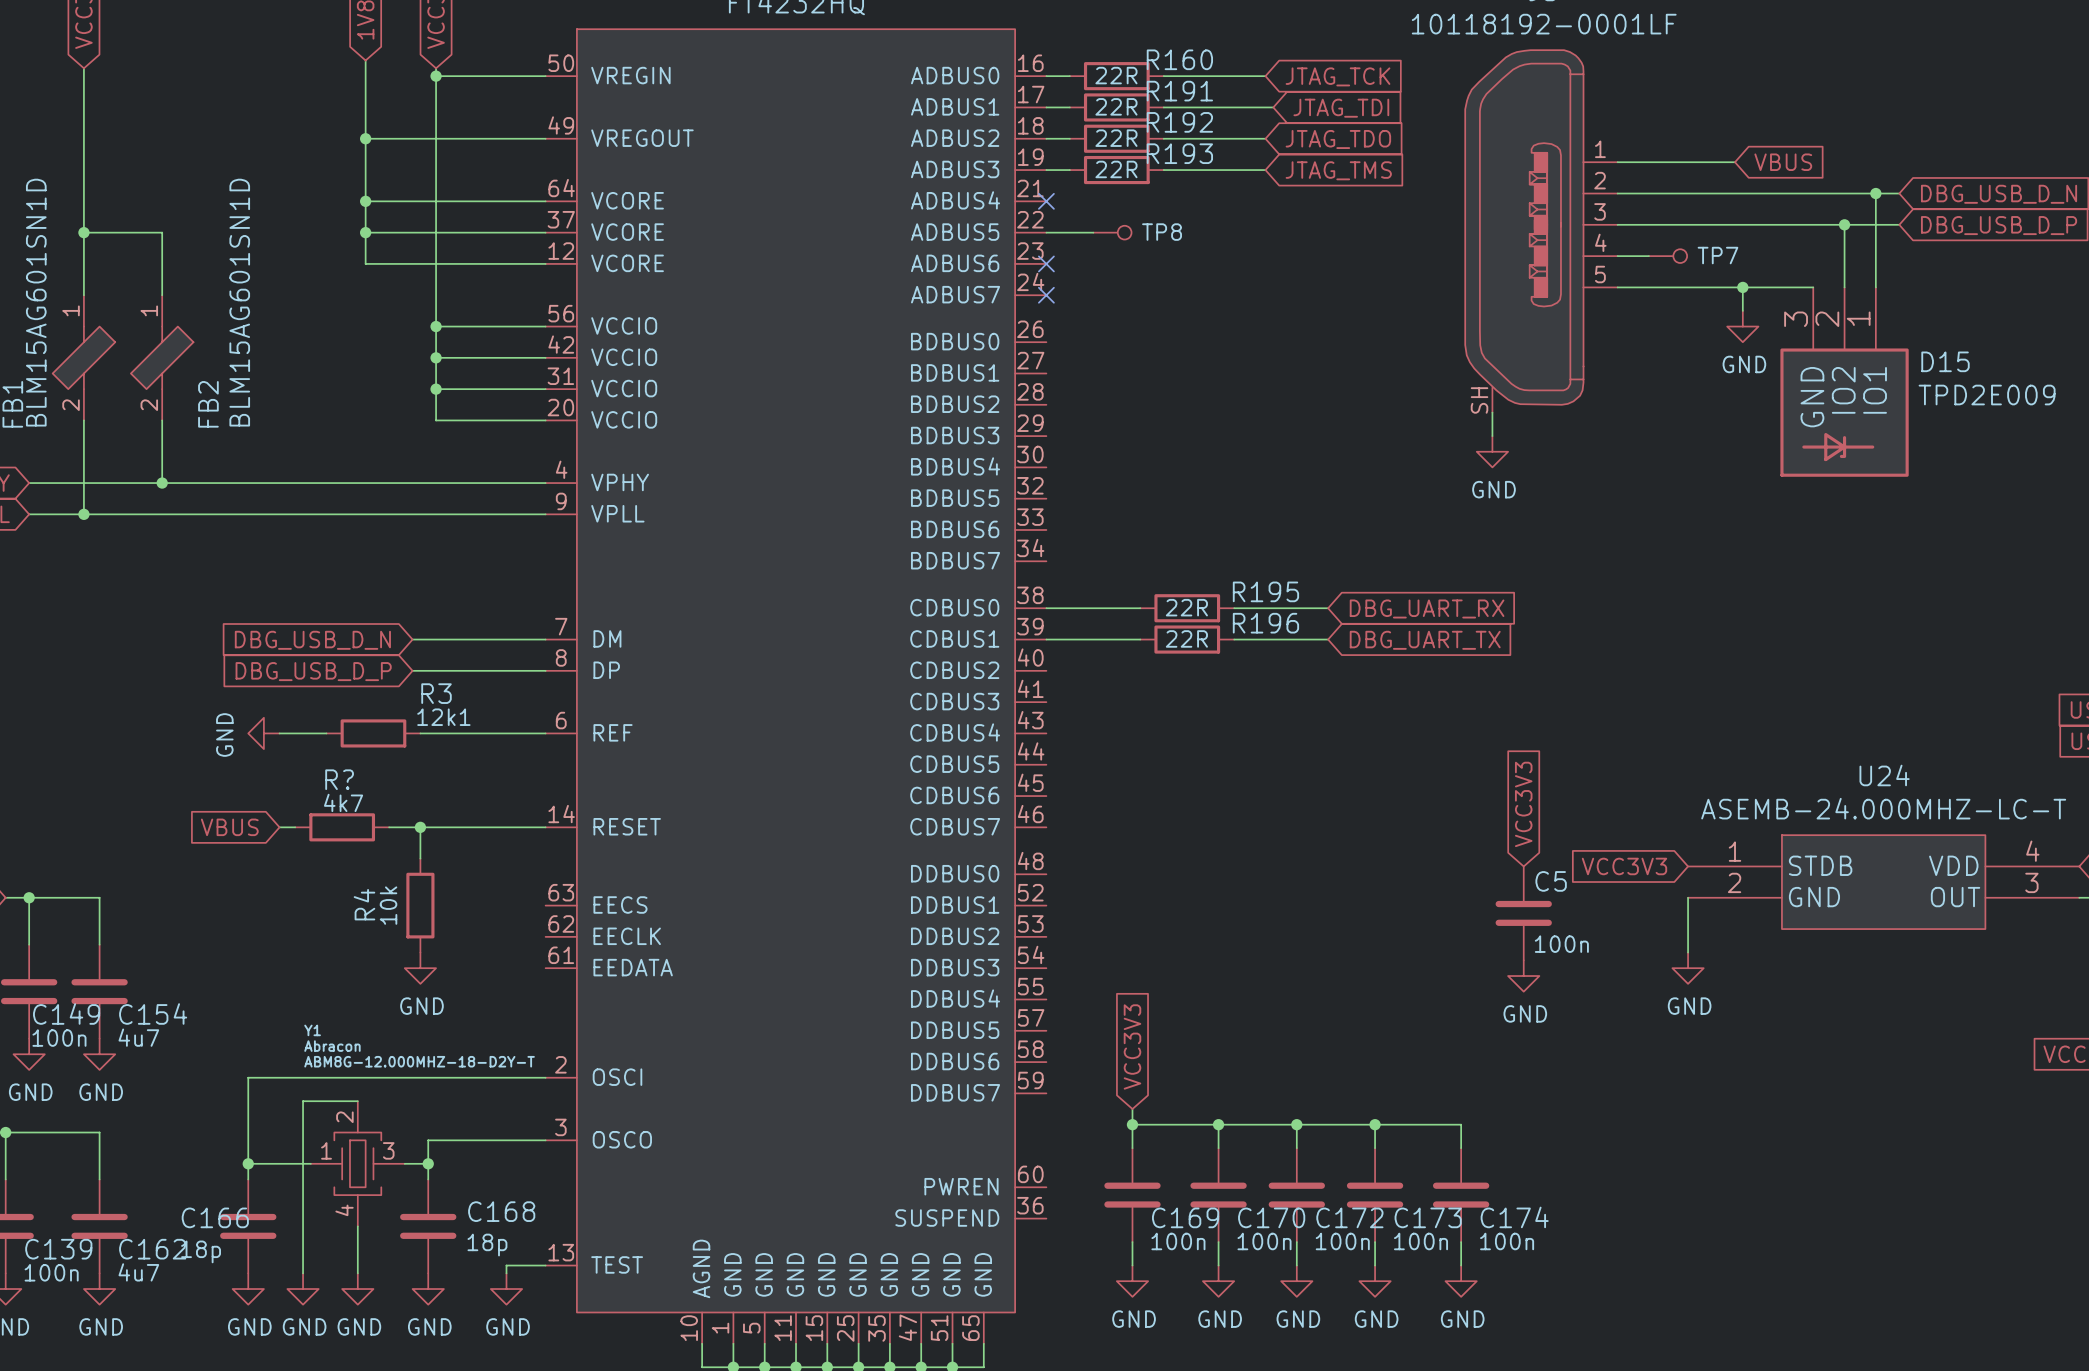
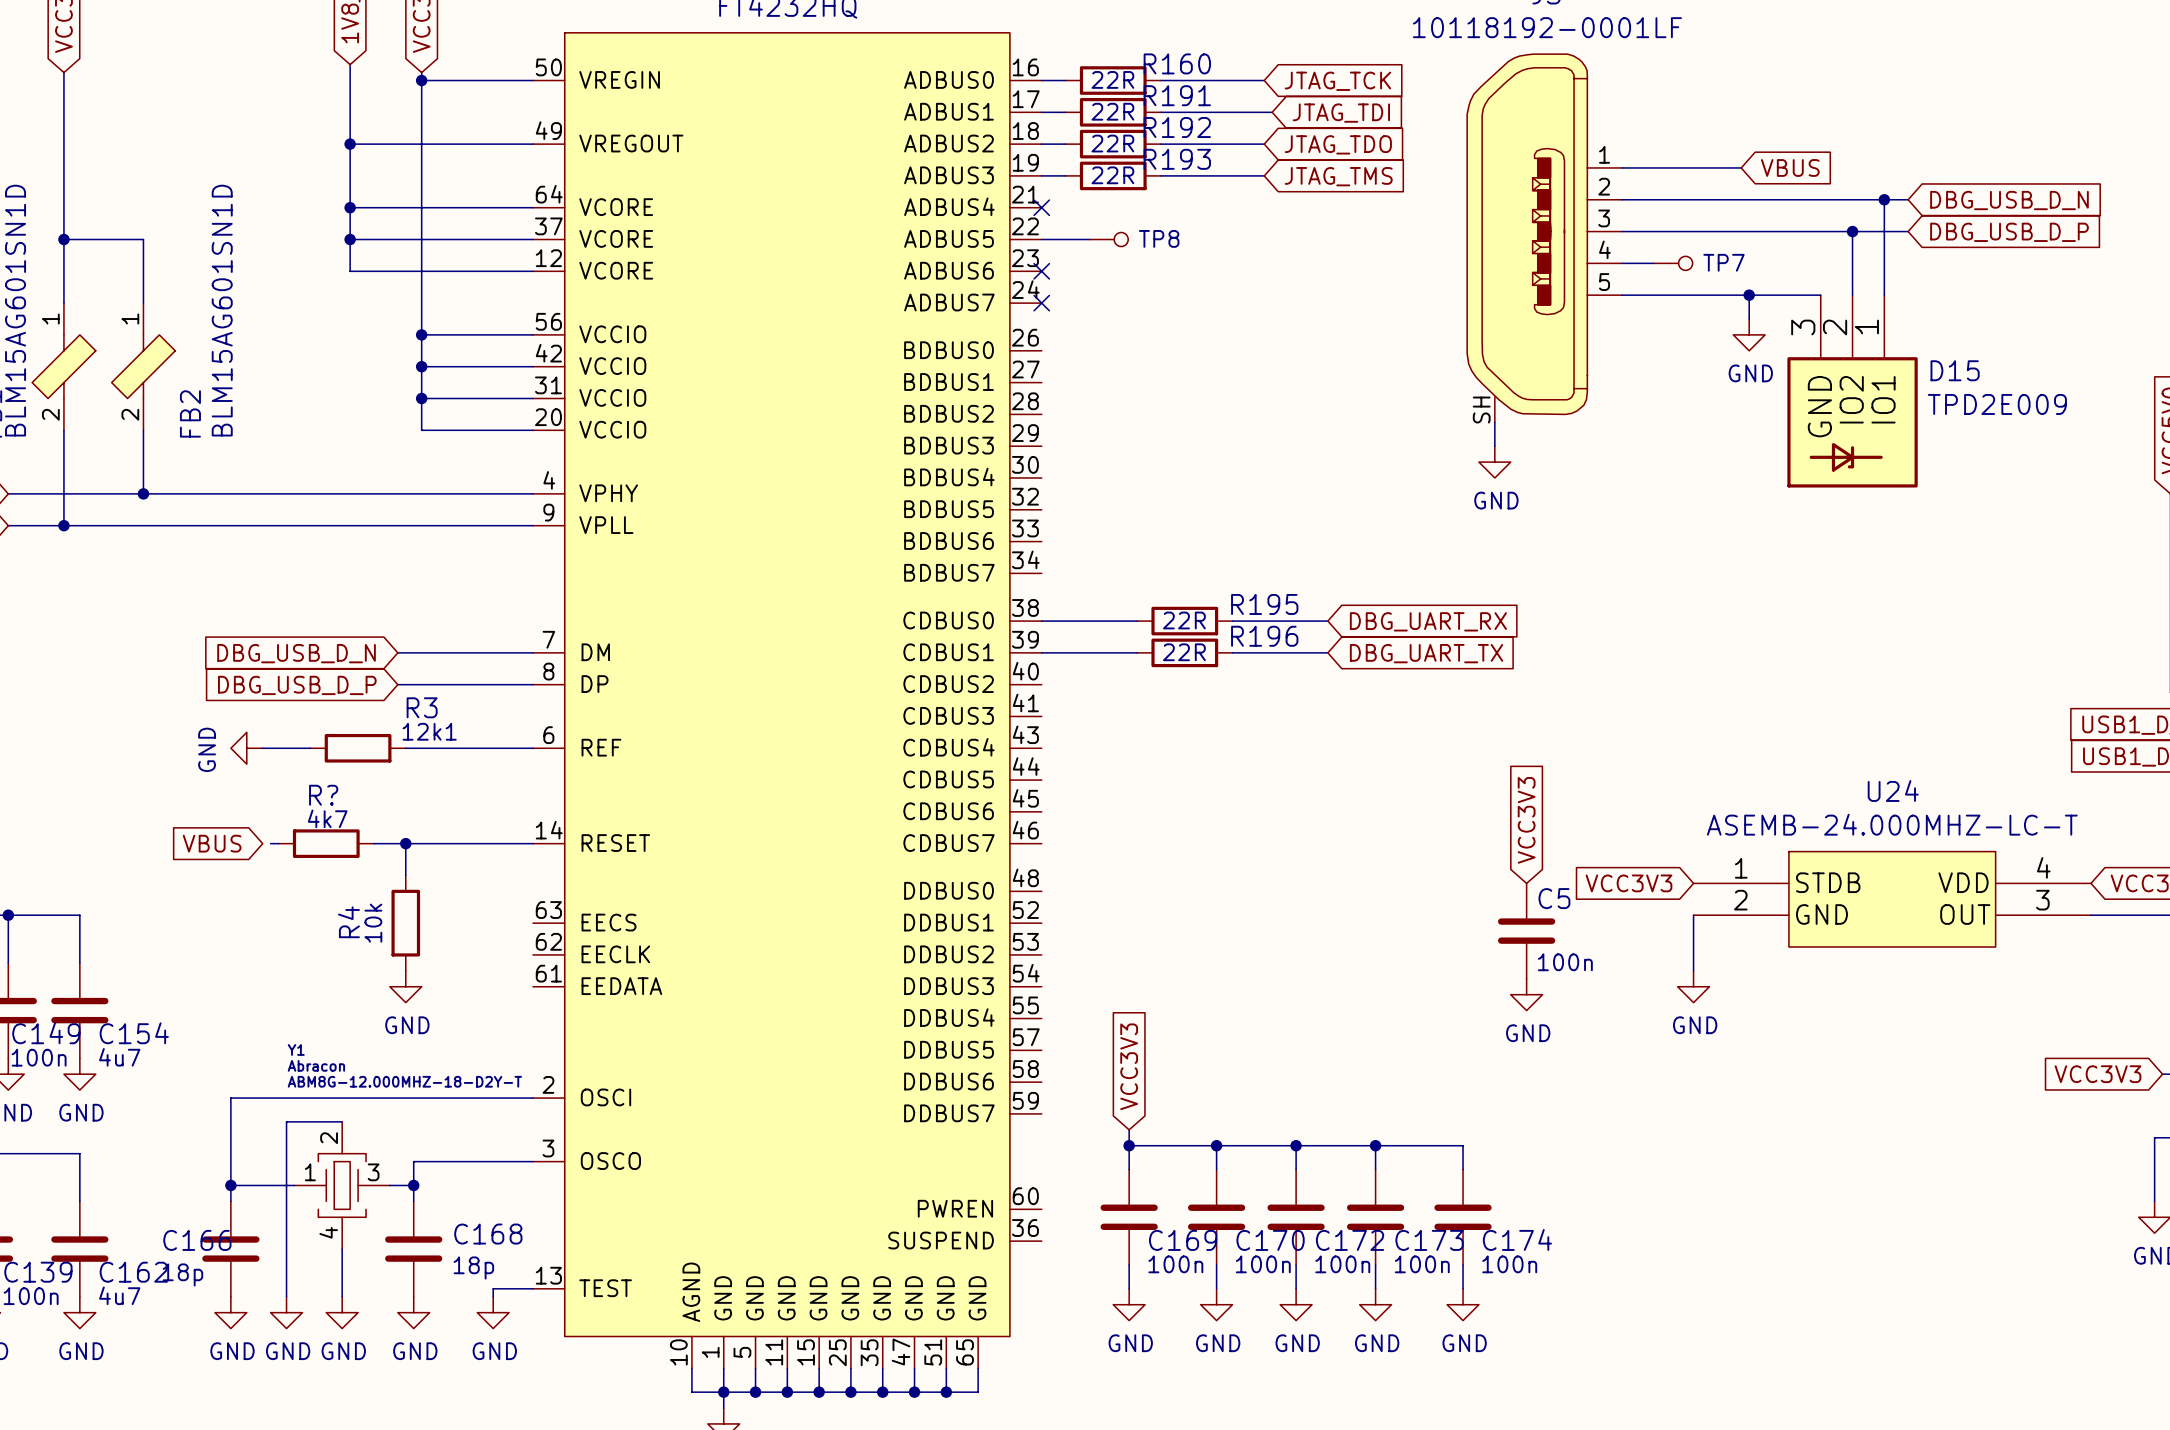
wire: (279, 827) (287, 827) -> none

